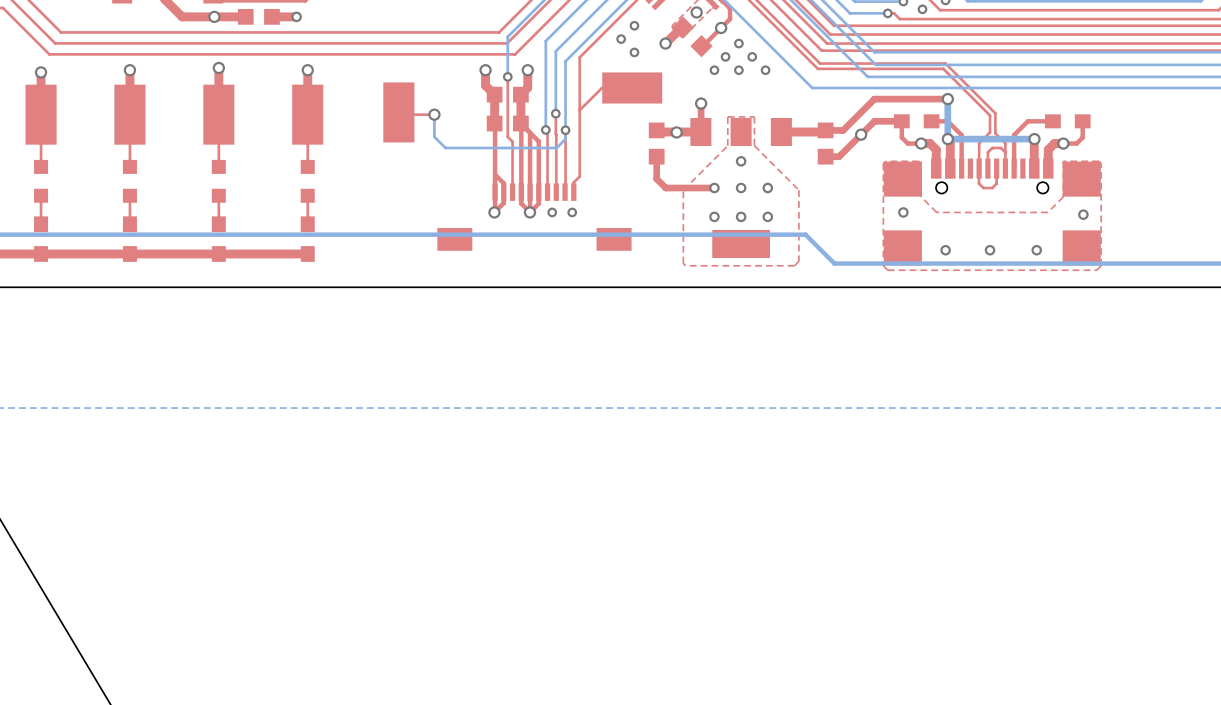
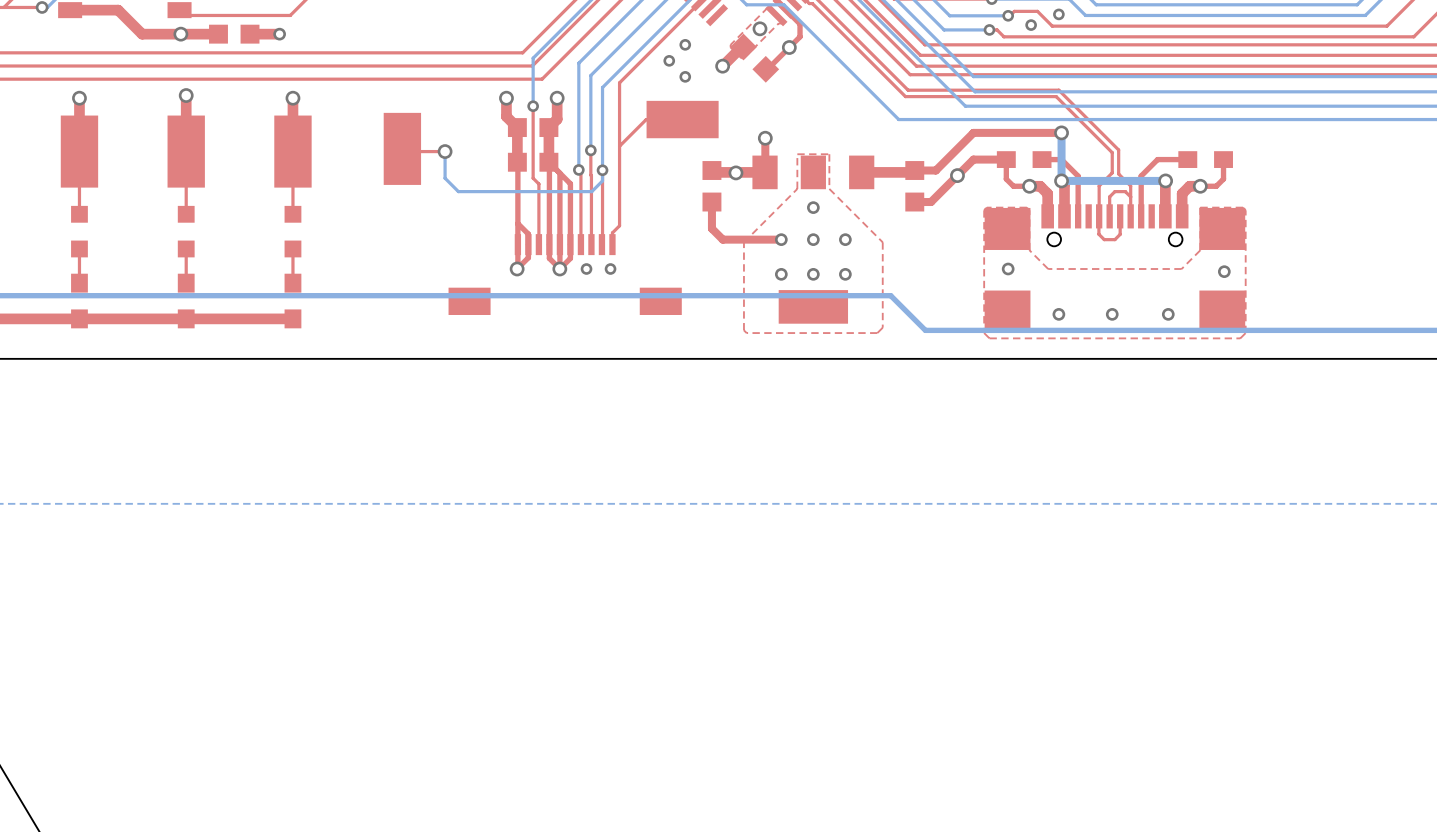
via: (738, 43) -> none
via: (725, 56) -> none
via: (752, 56) -> none
via: (714, 70) -> none
via: (738, 70) -> none
via: (765, 70) -> none

